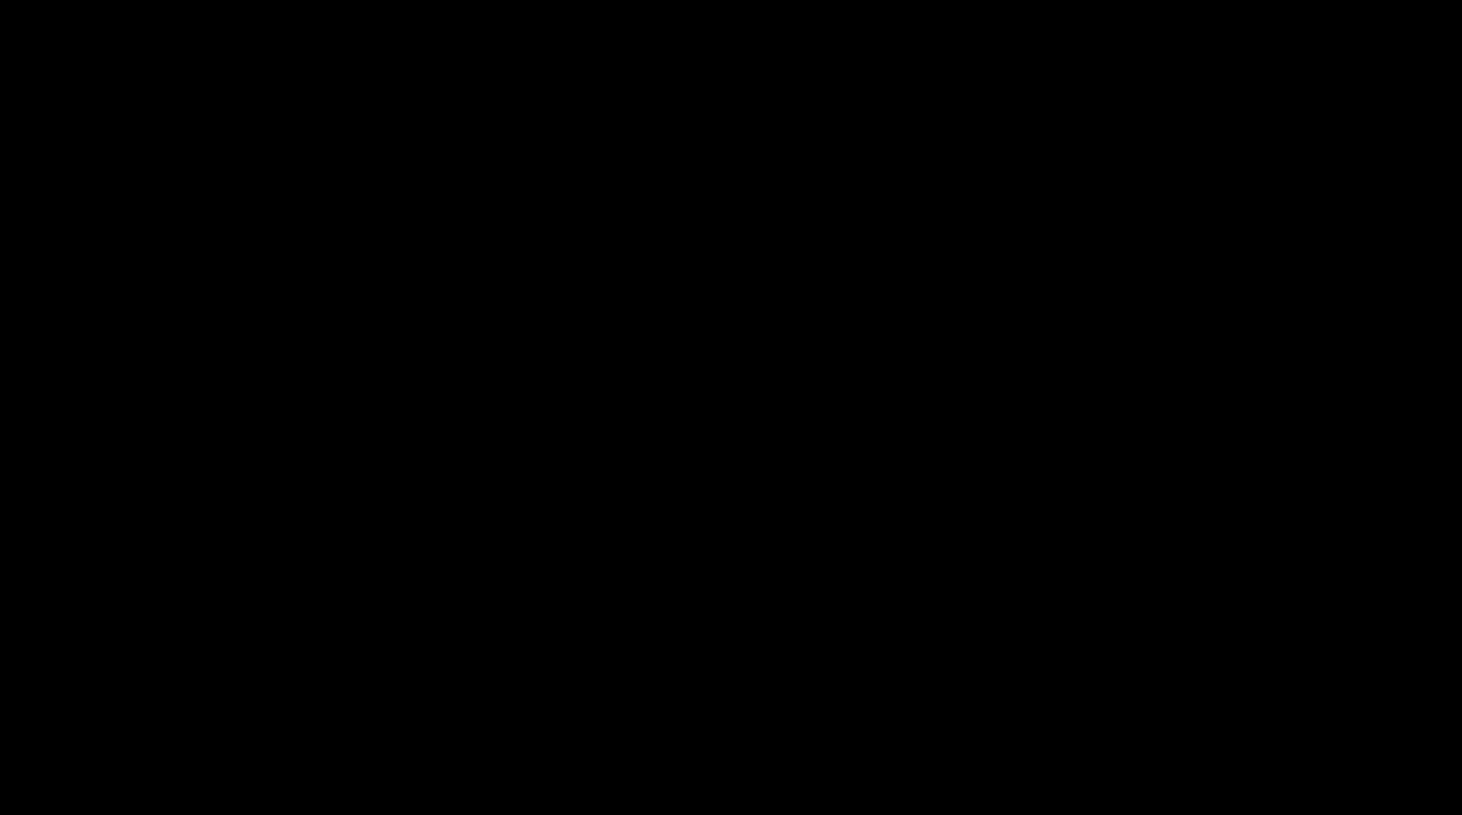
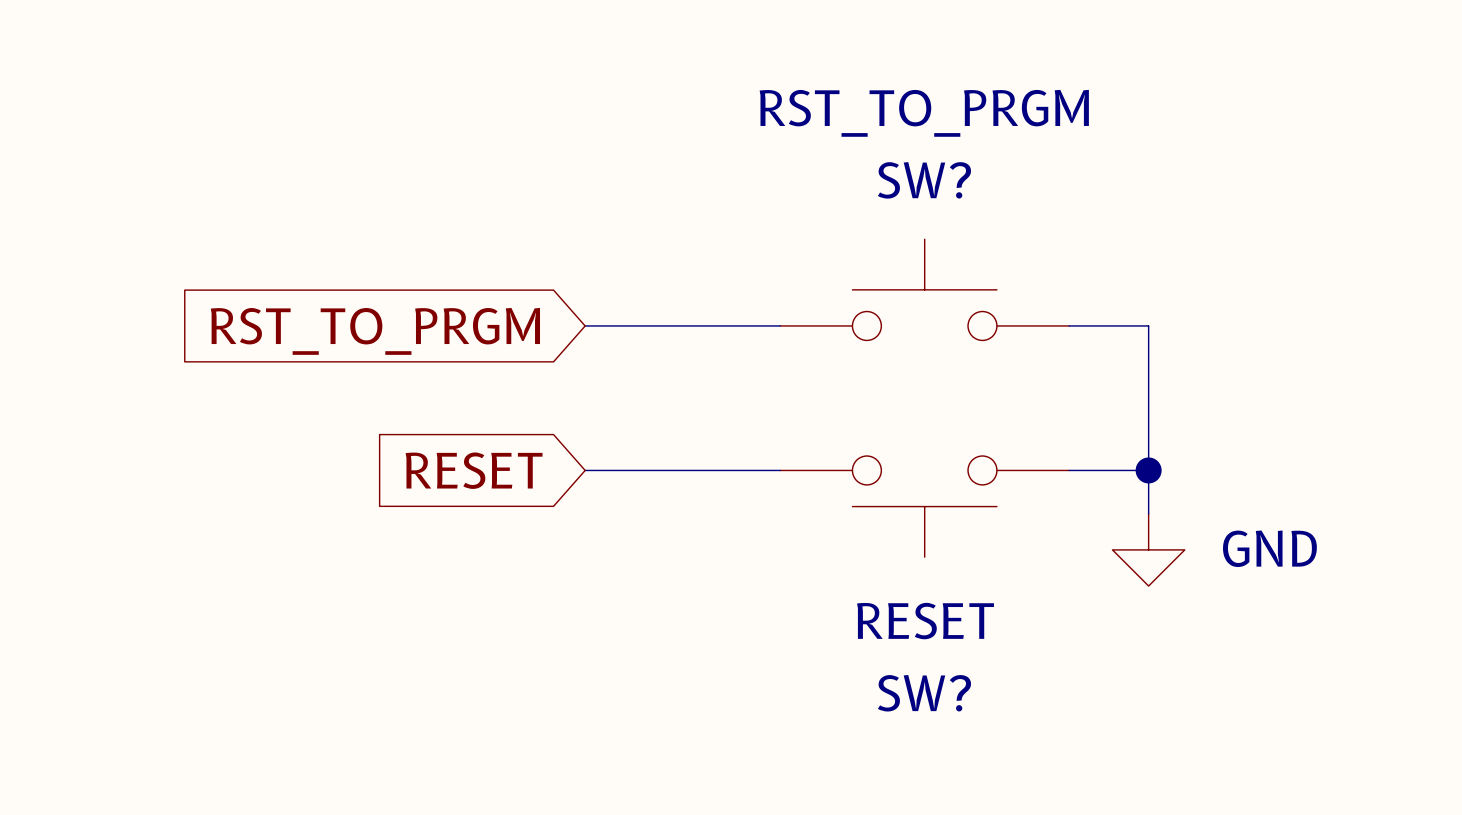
SW?: none -> RST_TO_PRGM (924, 289)
wire: none -> (585, 325) (780, 325)
wire: none -> (1069, 325) (1148, 325) (1148, 513)
global label: none -> RST_TO_PRGM (375, 331)
global label: none -> RESET (474, 470)
wire: none -> (585, 470) (780, 470)
wire: none -> (1069, 470) (1148, 470)
junction: none -> (1148, 470)
SW?: none -> RESET (924, 506)
power symbol: none -> GND (1148, 549)

